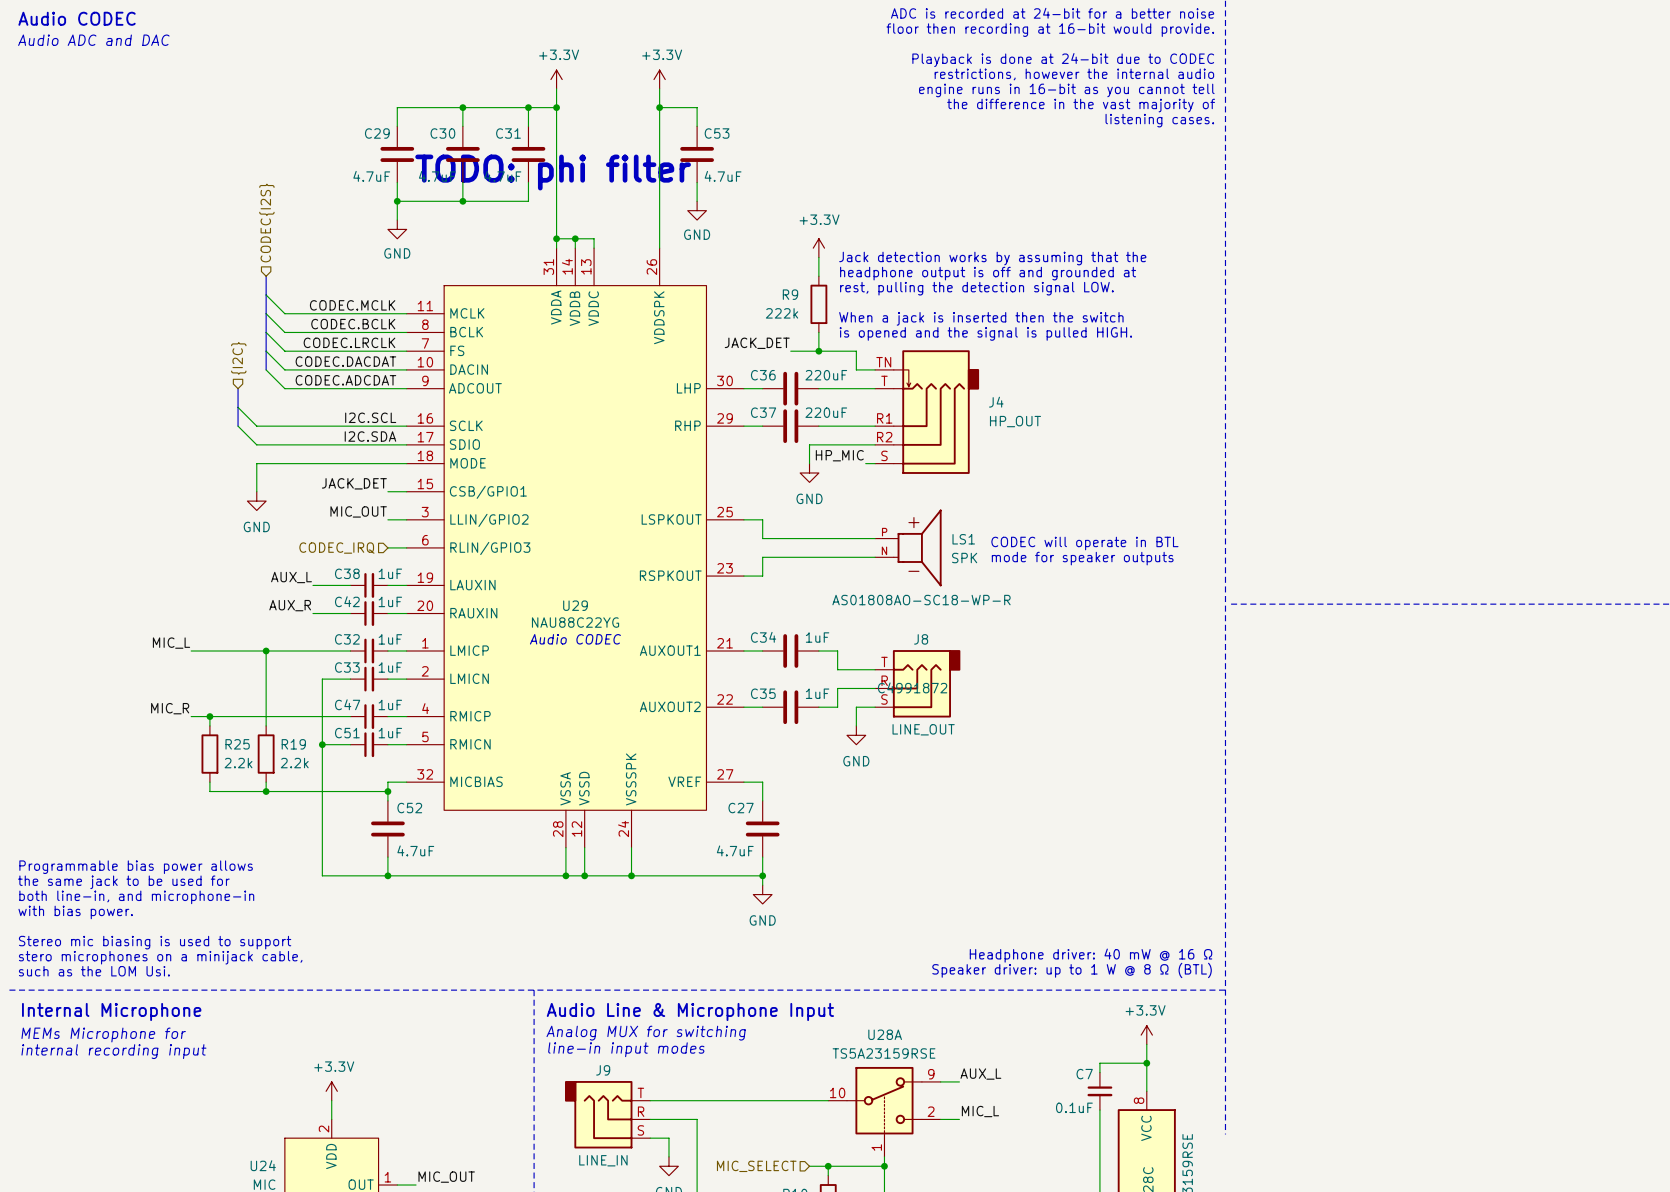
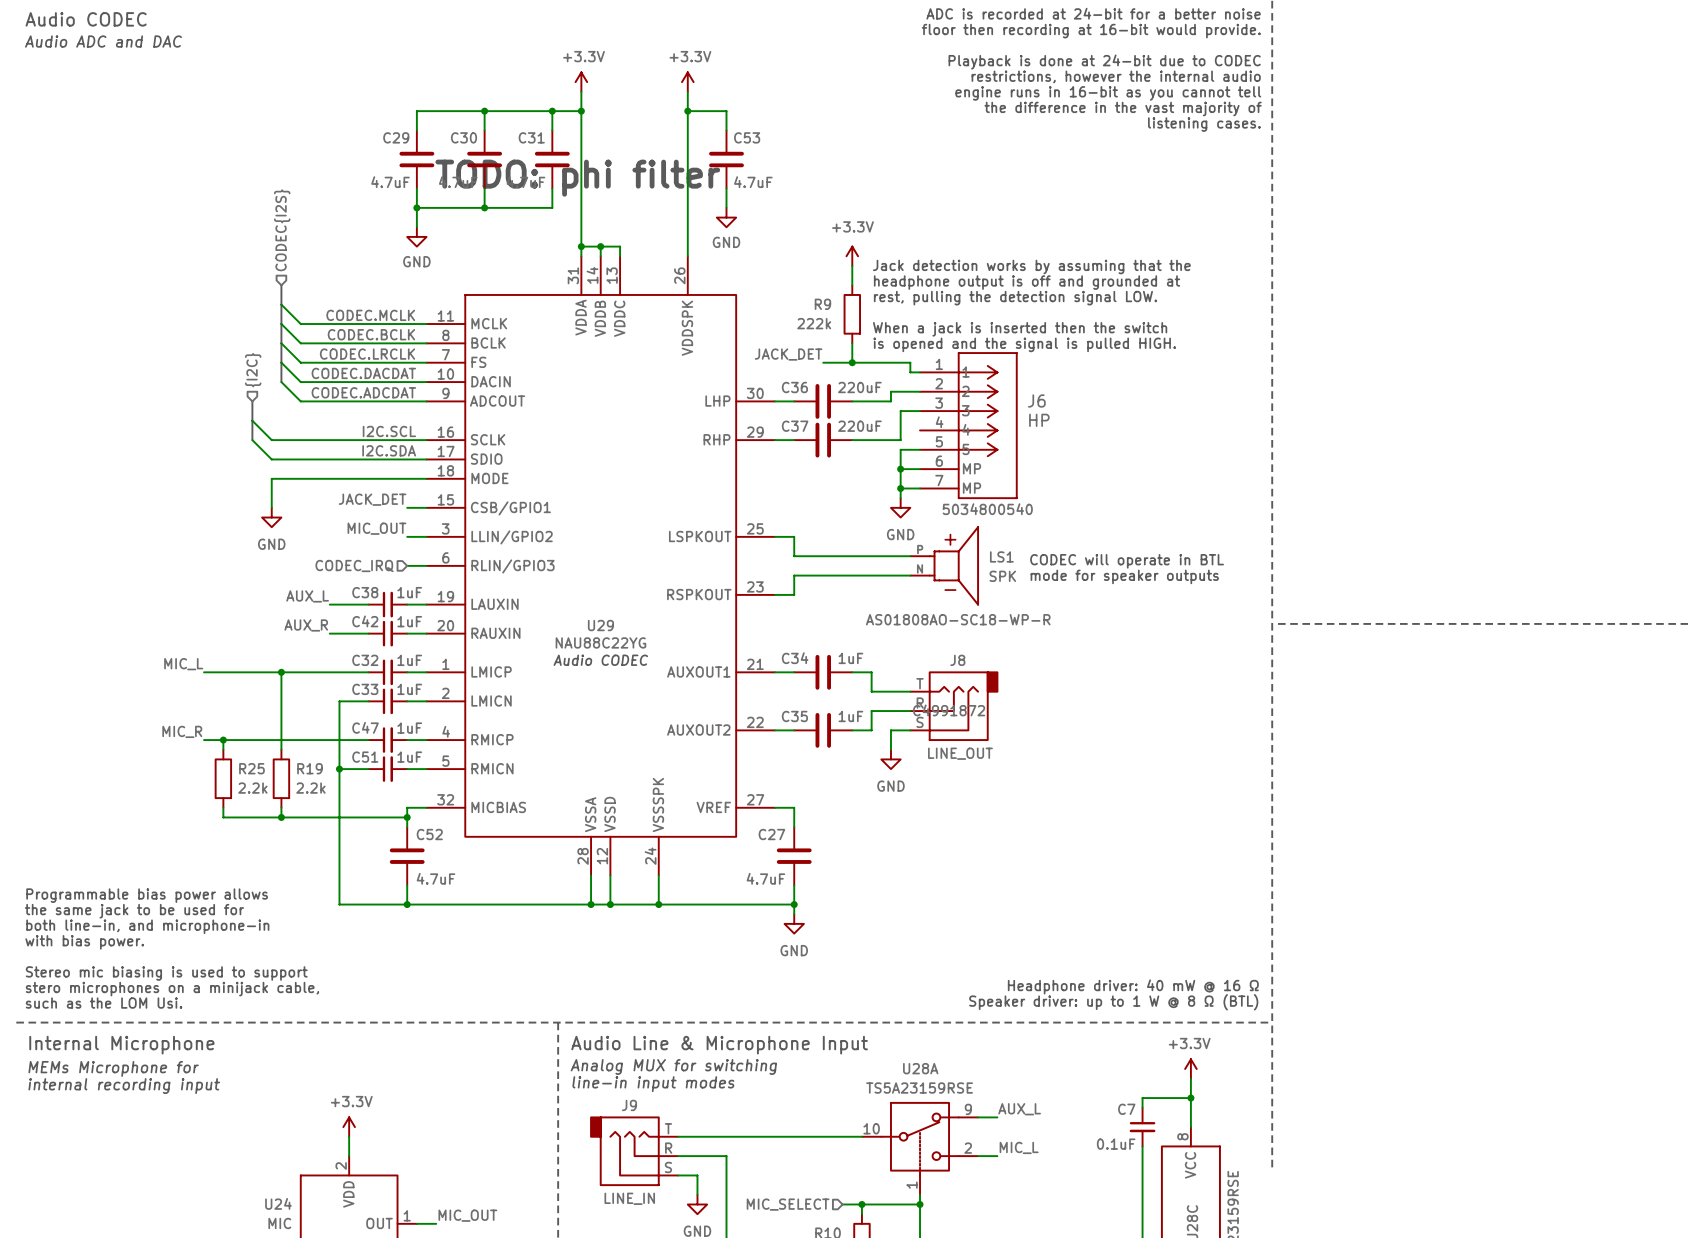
wire: (856, 351) (856, 369) (875, 369) -> (890, 362) (910, 362) (910, 372) (920, 372)
wire: (856, 388) (875, 388) -> (890, 401) (890, 391) (920, 391)
J4: HP_OUT (927, 412) -> none
J6: none -> HP (968, 425)
wire: (865, 426) (875, 426) -> (900, 440) (900, 411) (920, 411)
wire: none -> (920, 449) (900, 449) (900, 498)
wire: (875, 444) (809, 444) (809, 463) -> none
wire: none -> (900, 469) (920, 469)
junction: none -> (900, 469)
label: HP_MIC (839, 455) -> none
wire: (865, 463) (875, 463) -> none
power symbol position: GND (809, 472) -> GND (900, 507)
wire: none -> (900, 488) (920, 488)
junction: none -> (900, 488)

